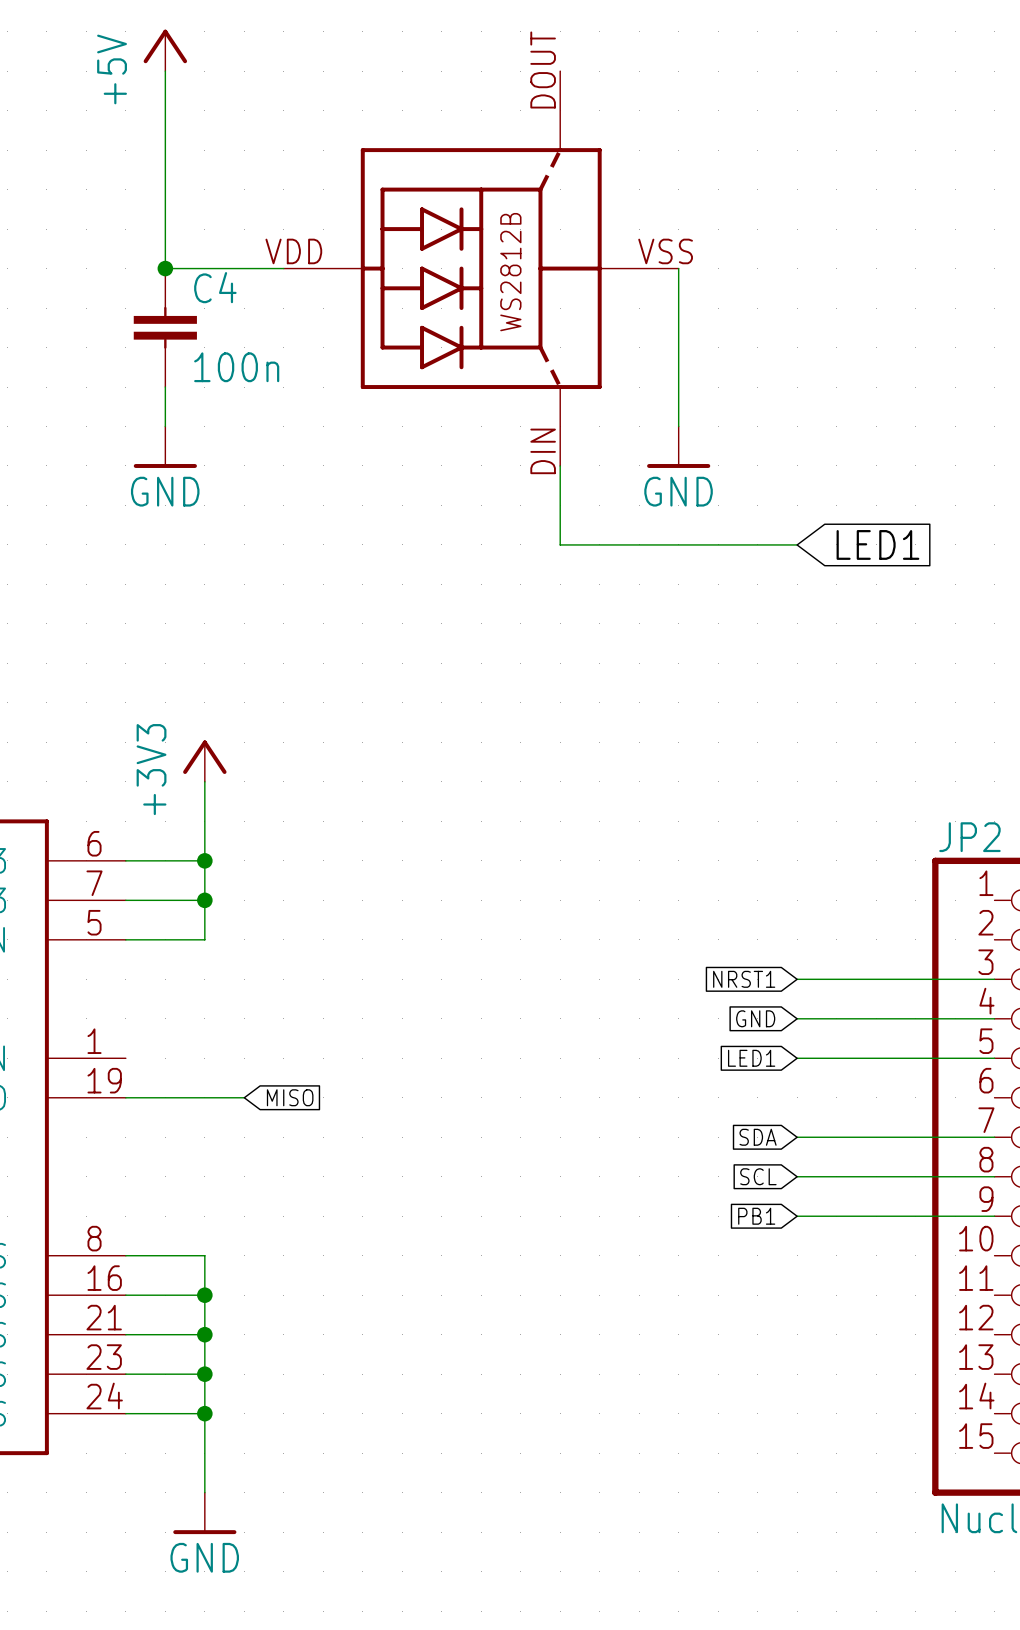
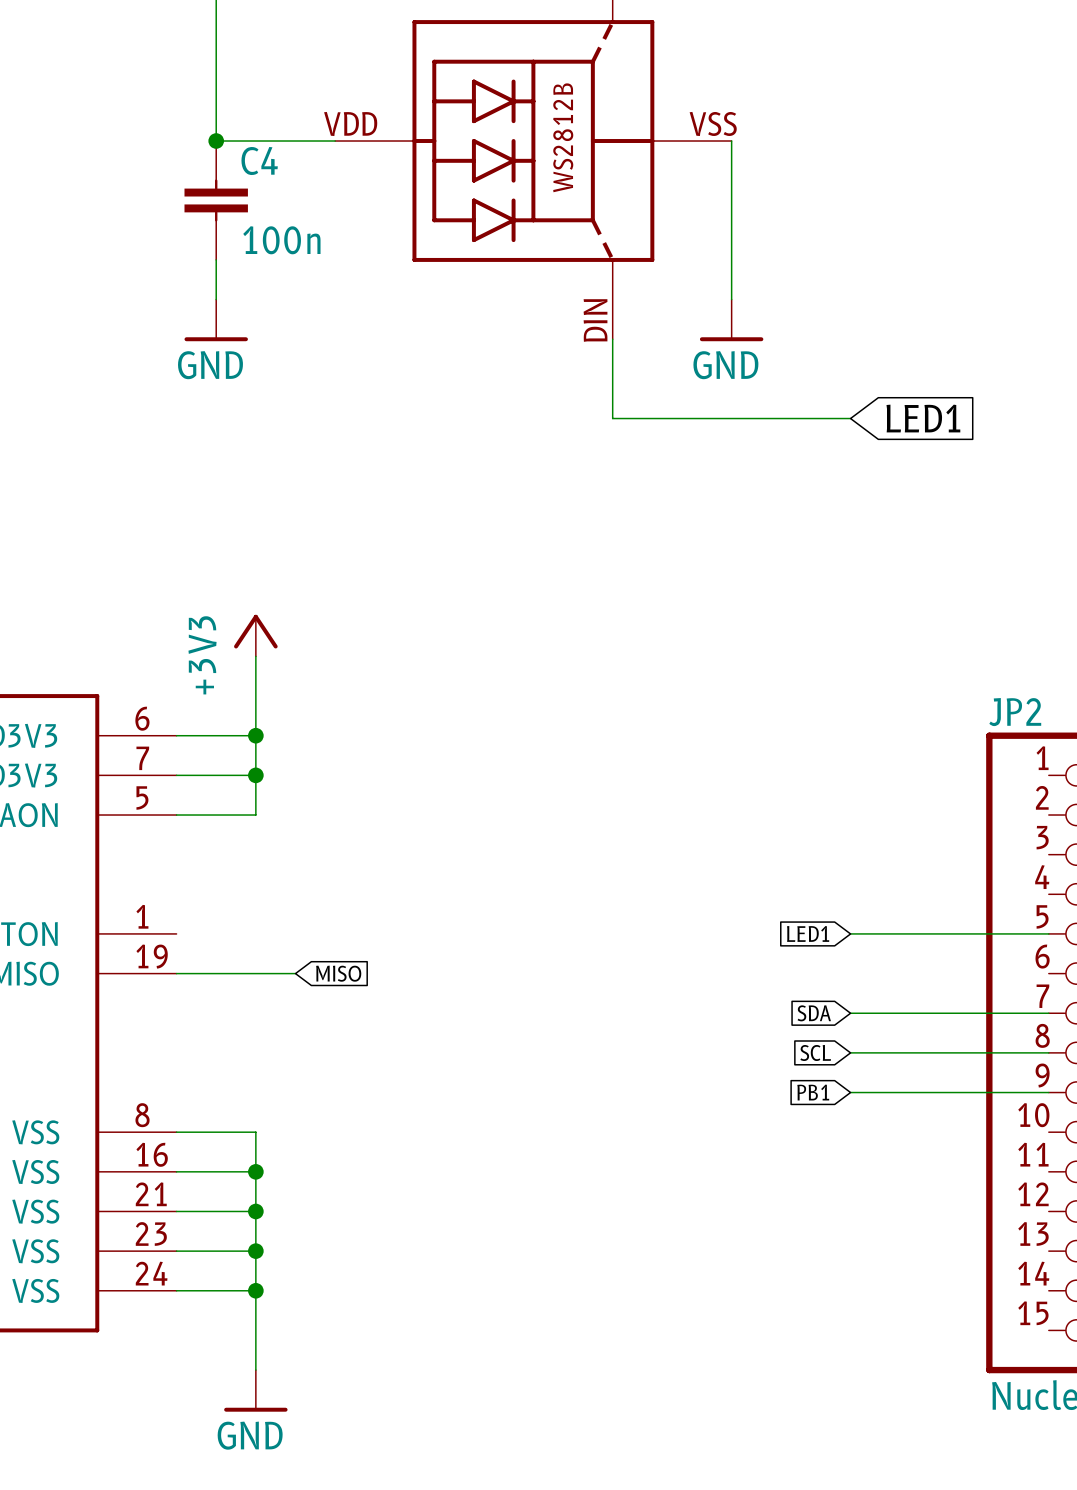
global label: NRST1 (744, 979) -> none
wire: (797, 979) (994, 979) -> none
global label: GND (755, 1018) -> none
wire: (797, 1018) (994, 1018) -> none

